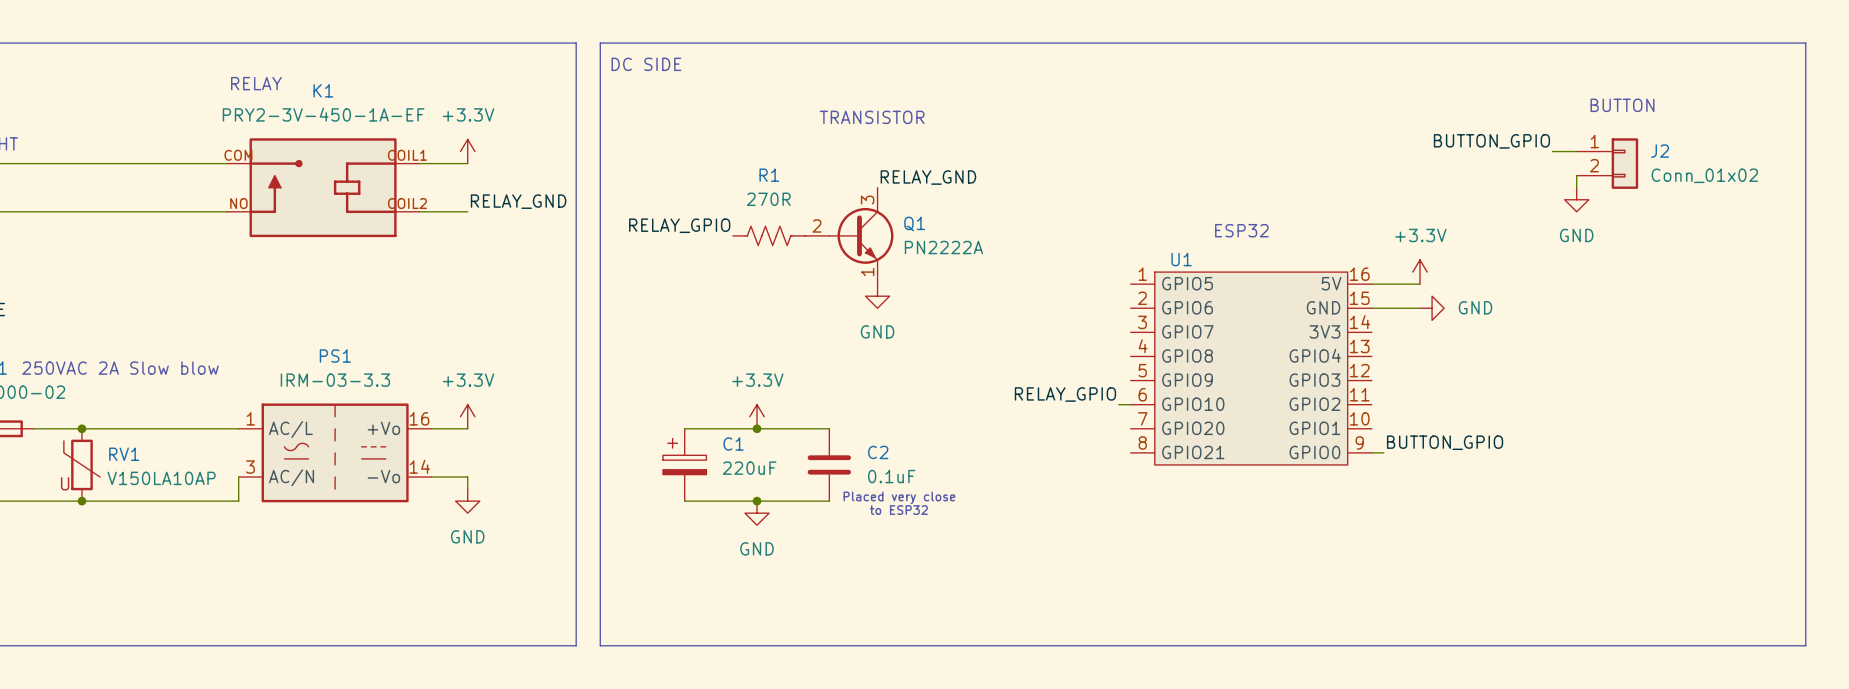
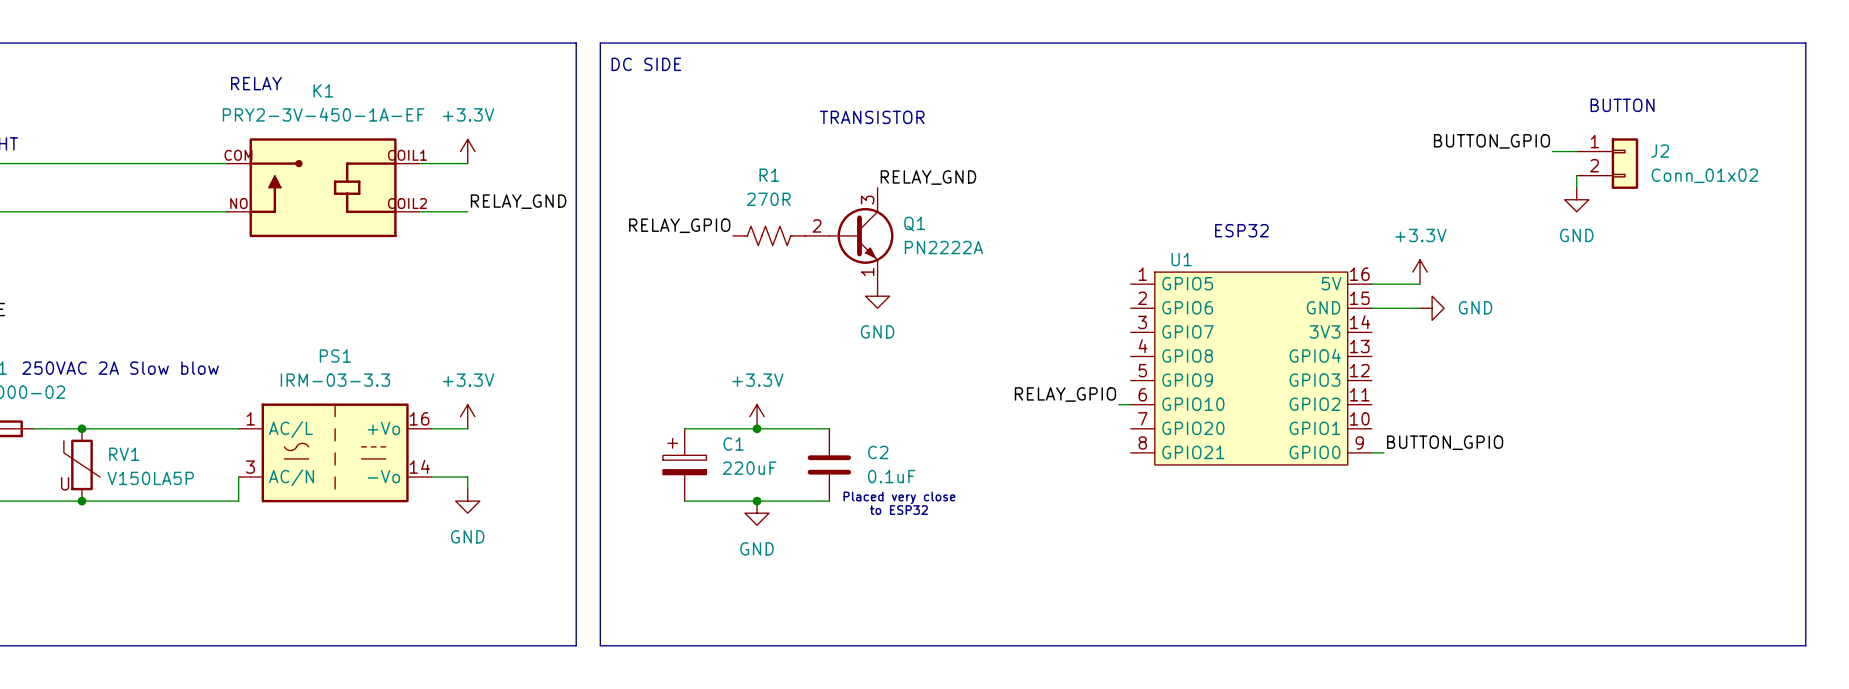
RV1 value: V150LA10AP (161, 478) -> V150LA5P (150, 478)

